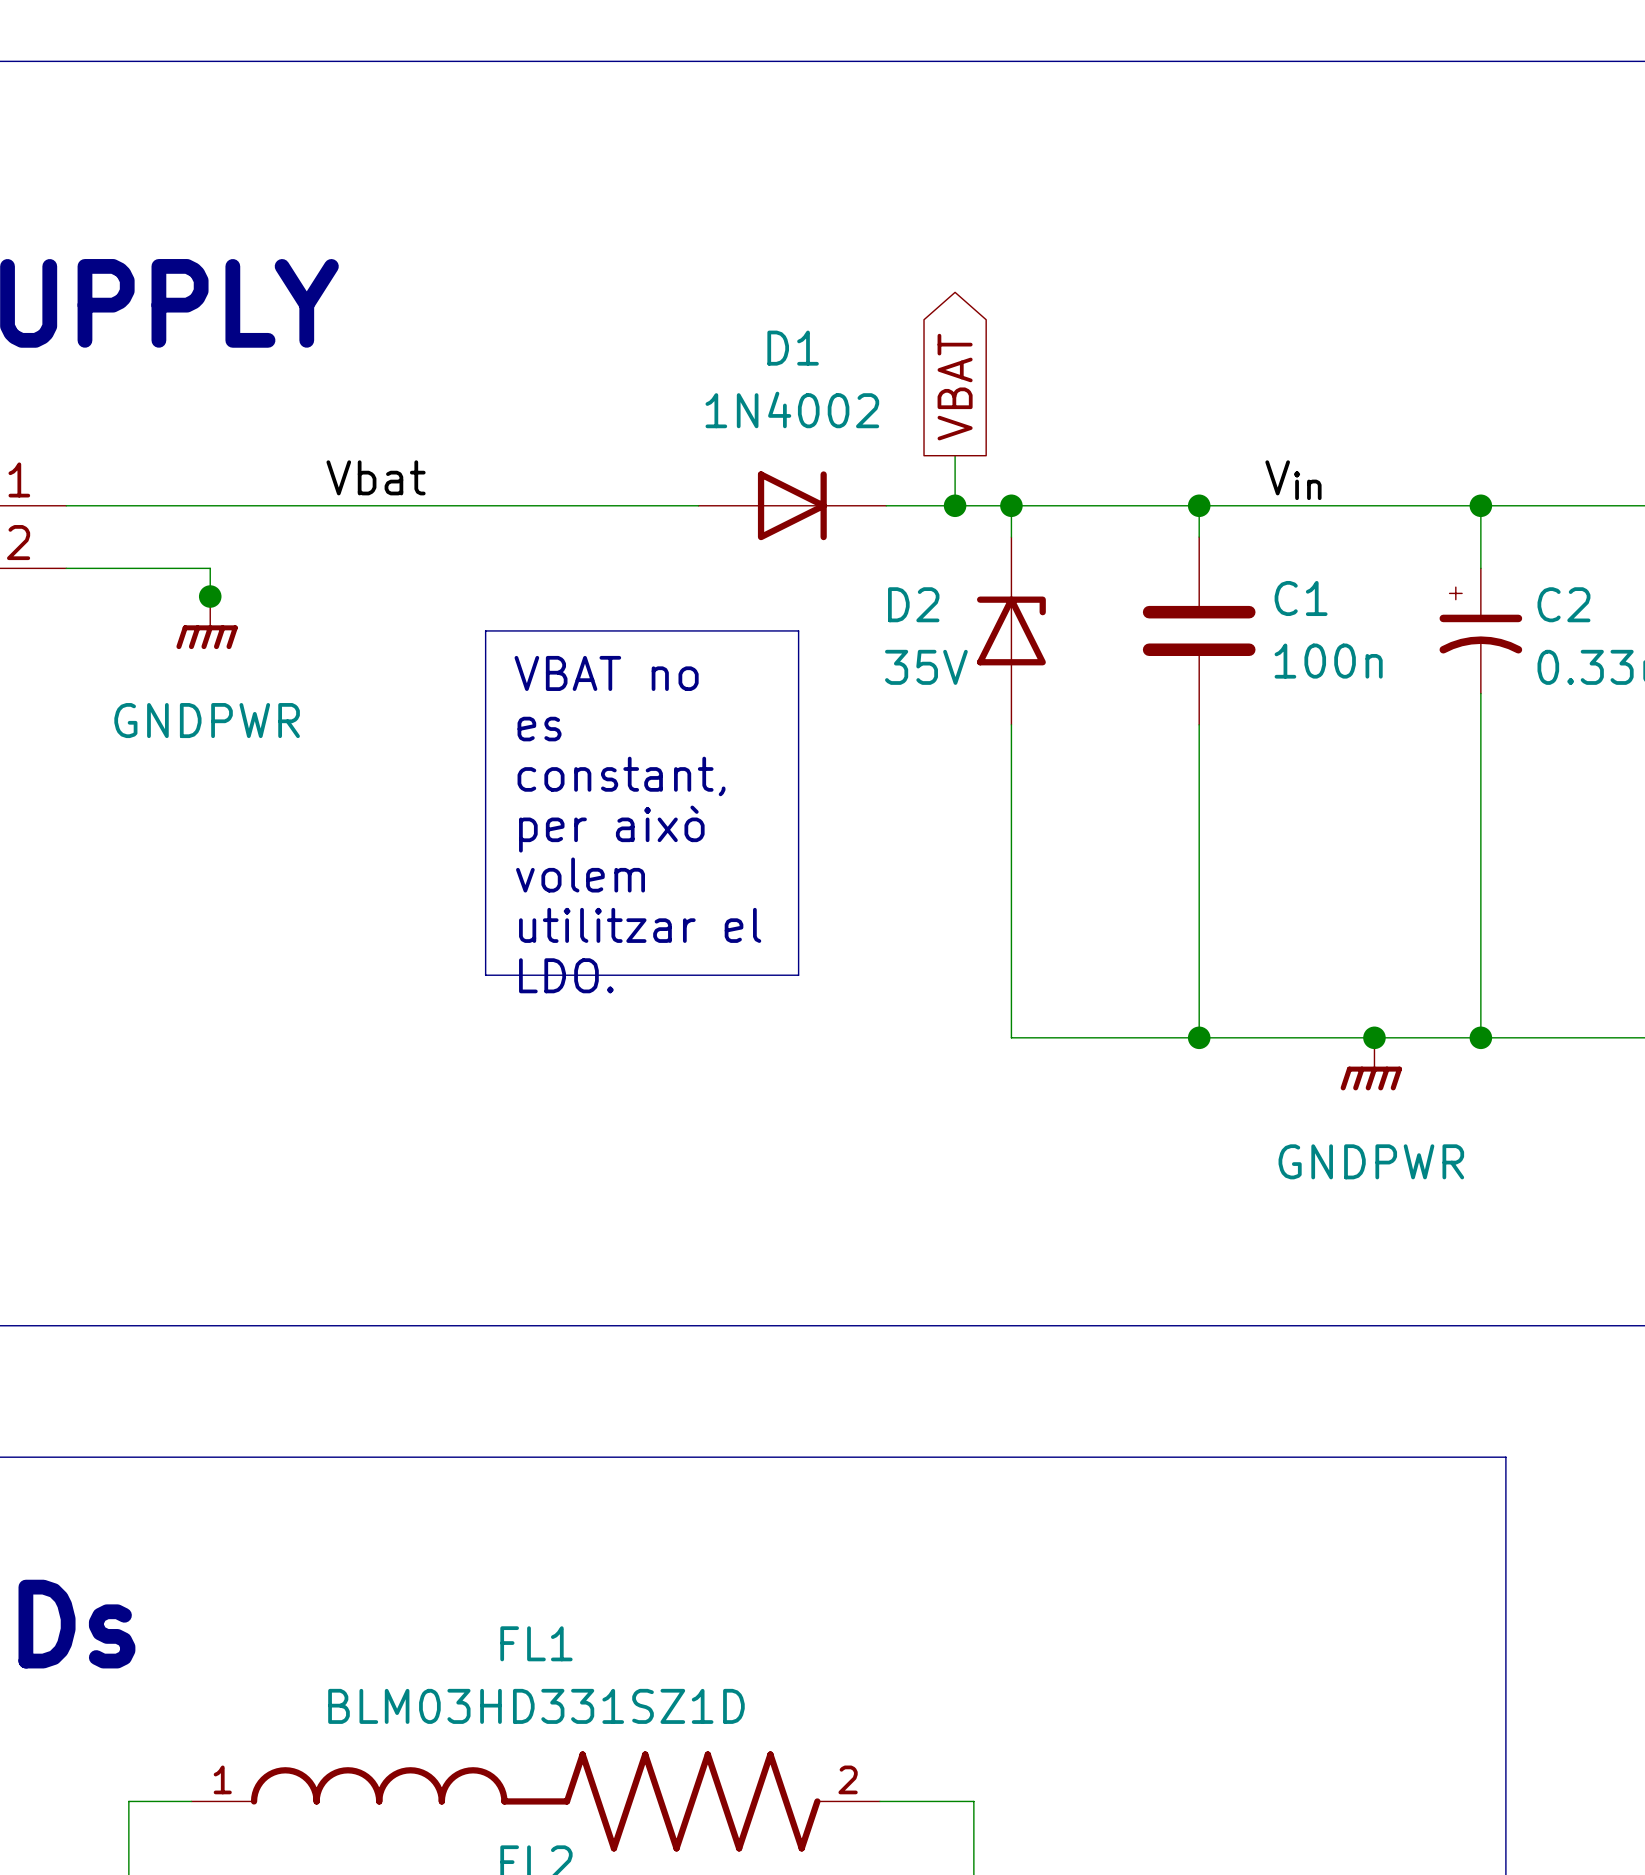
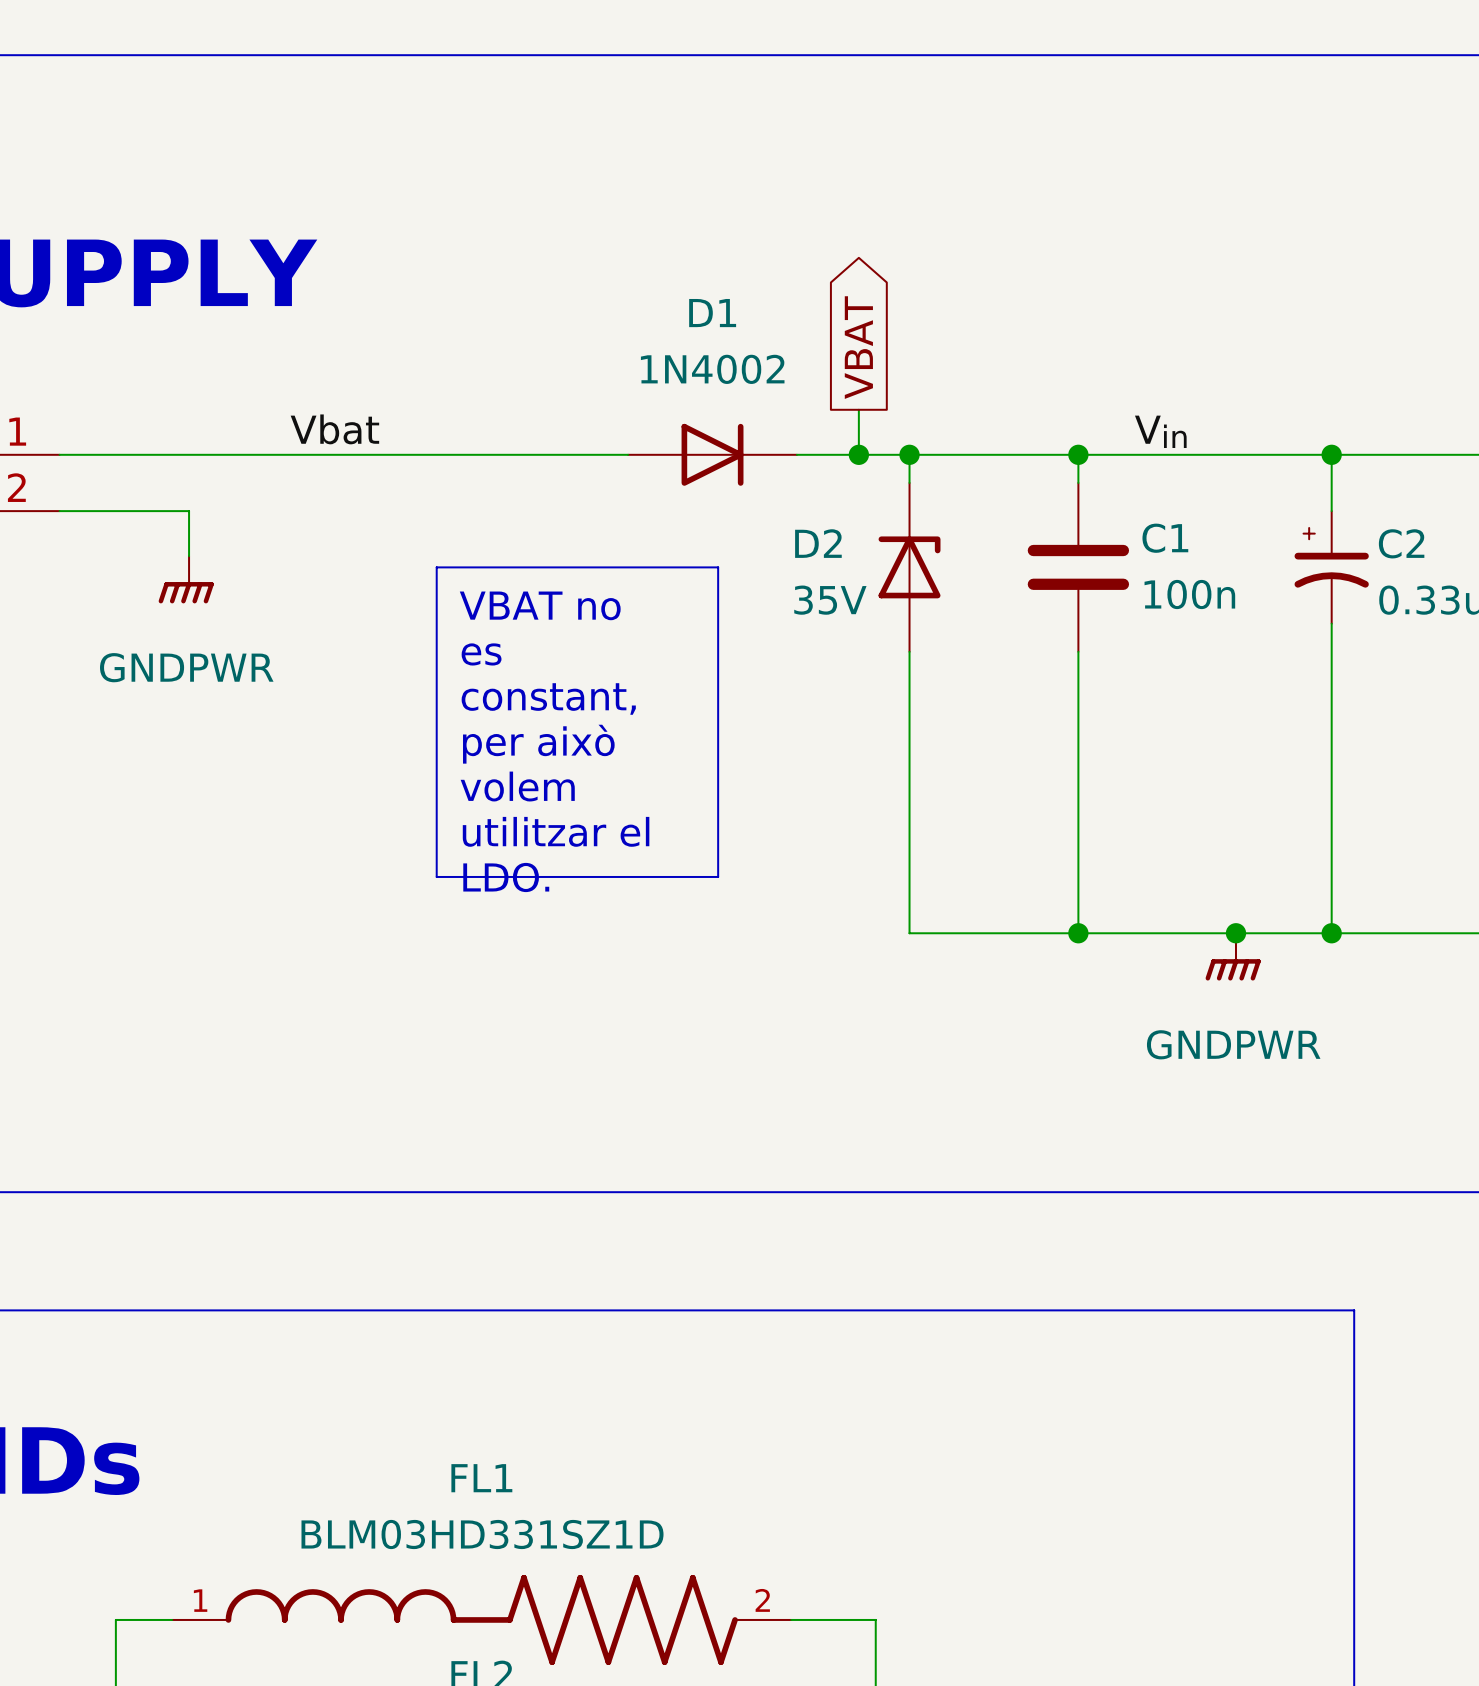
junction: (210, 596) -> none
power symbol position: GNDPWR (207, 622) -> GNDPWR (186, 579)

